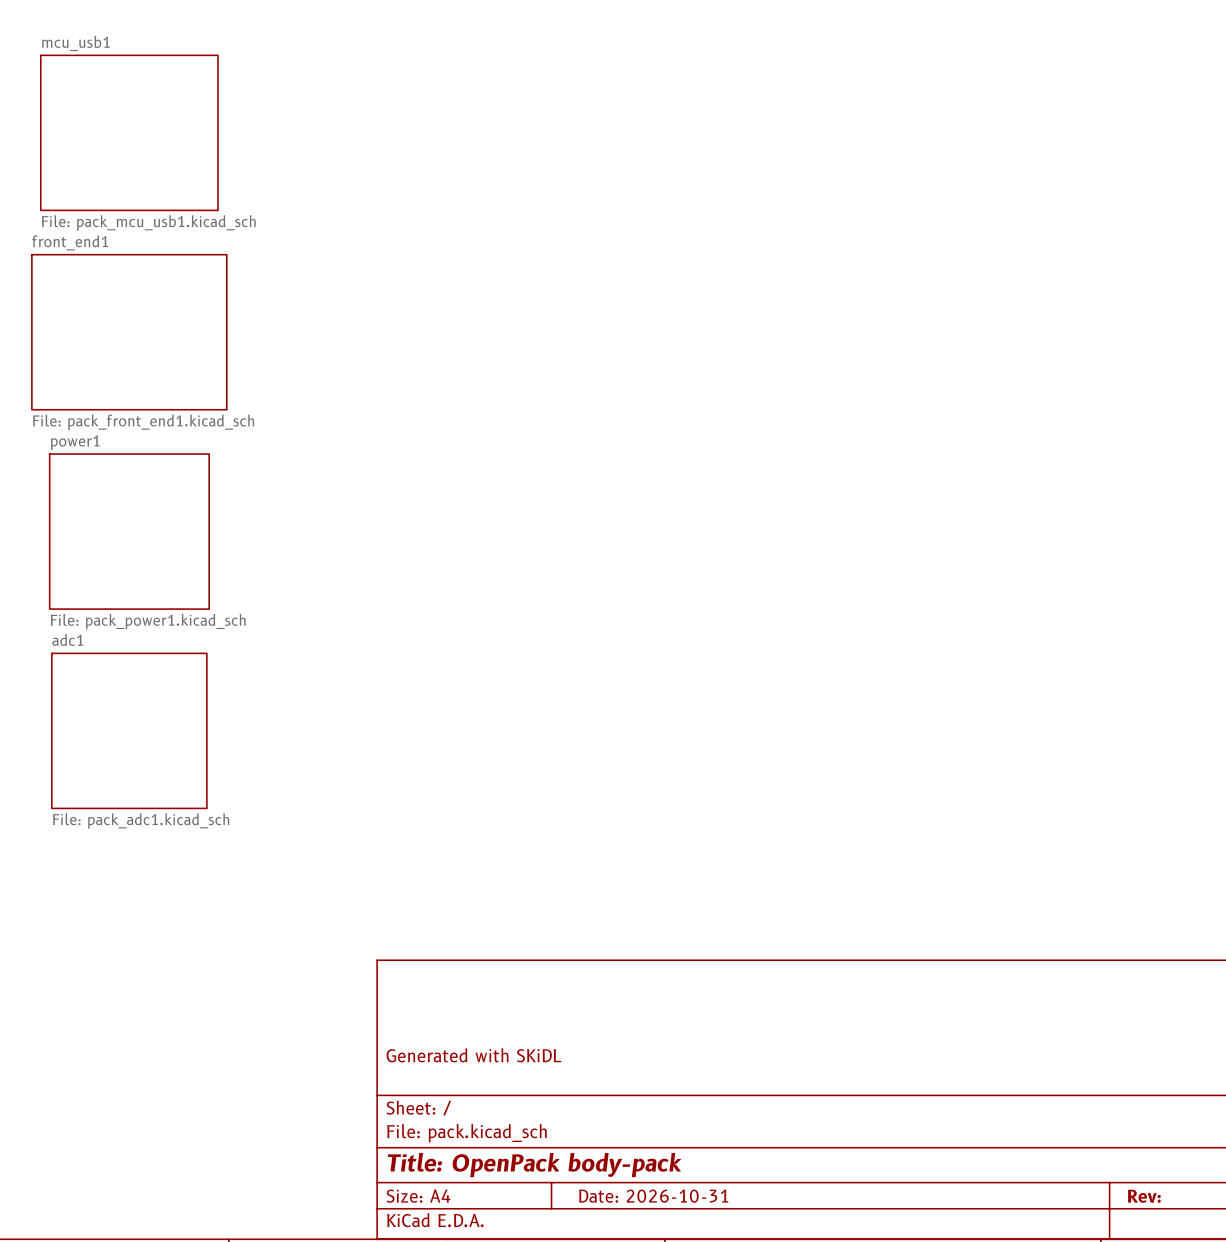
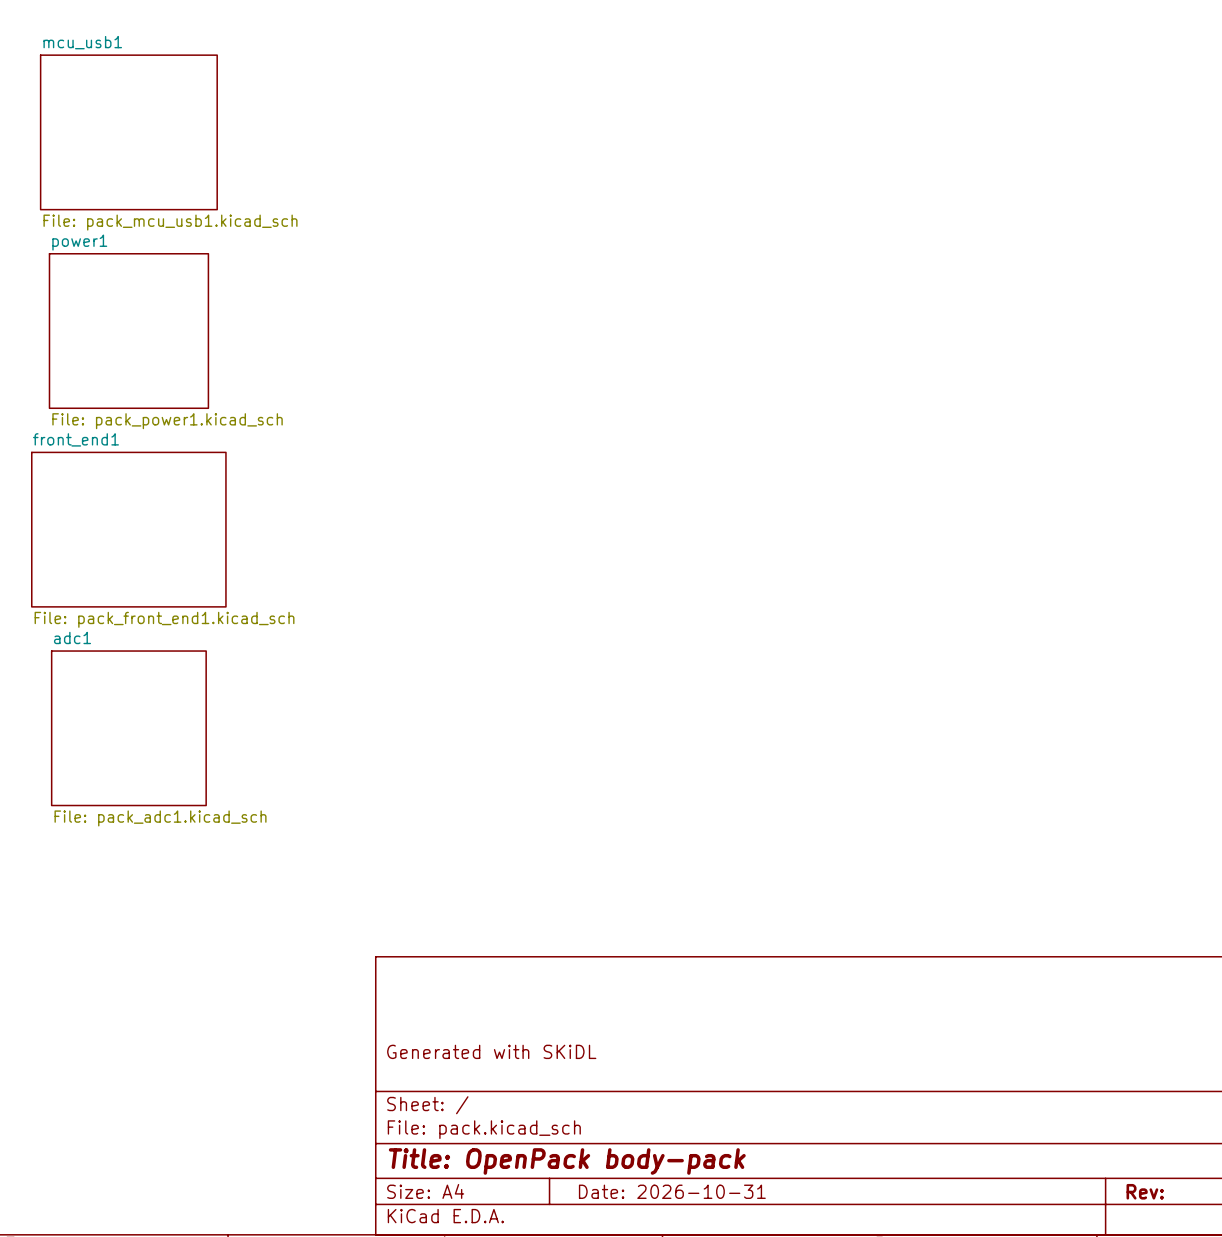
sheet front_end1 position: (129, 332) -> (128, 529)
sheet power1 position: (129, 531) -> (128, 331)

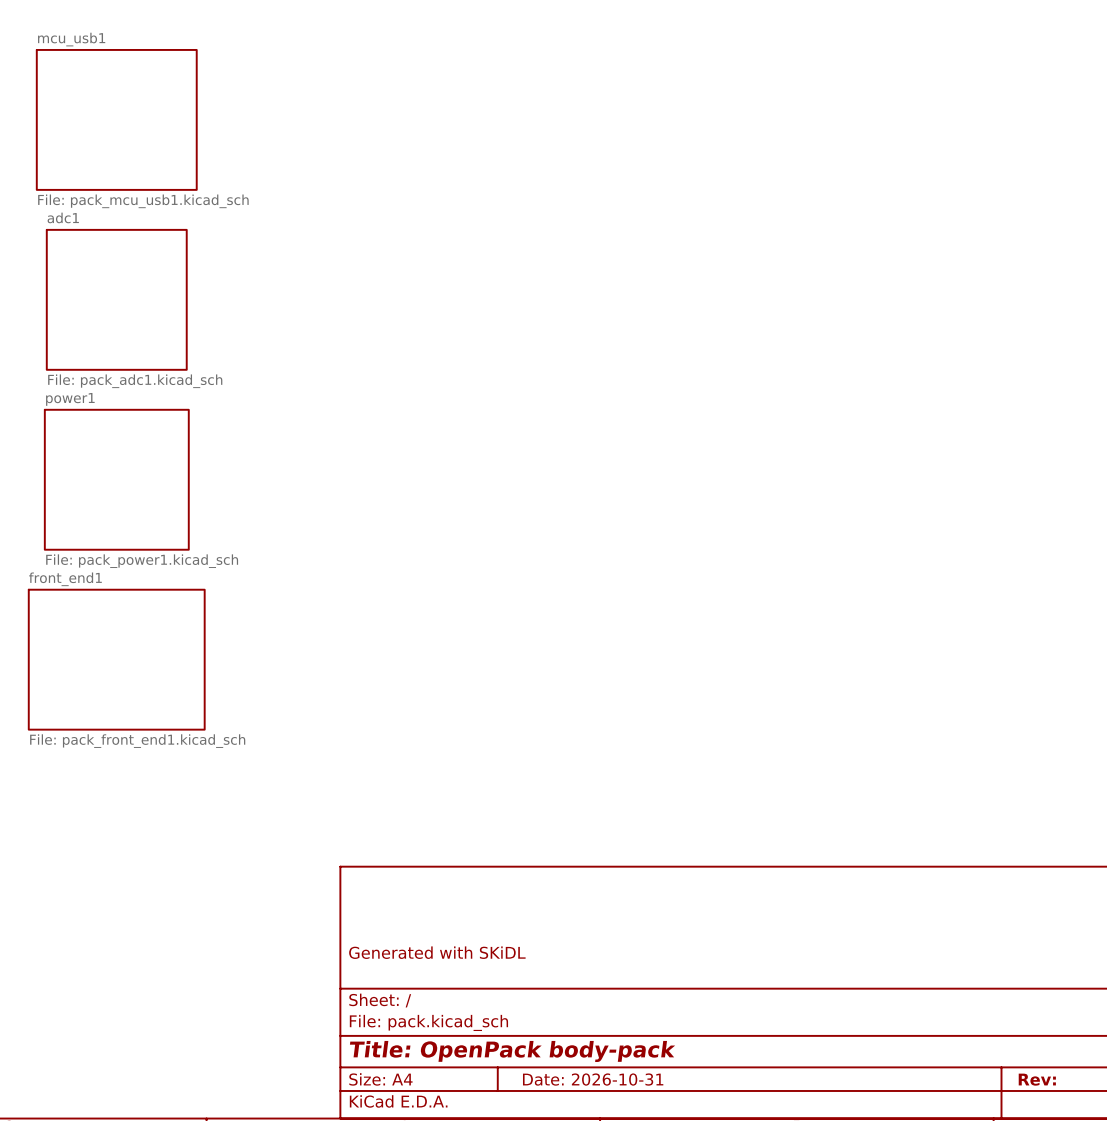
sheet power1 position: (128, 331) -> (116, 479)
sheet front_end1 position: (128, 529) -> (116, 659)
sheet adc1 position: (128, 728) -> (116, 299)

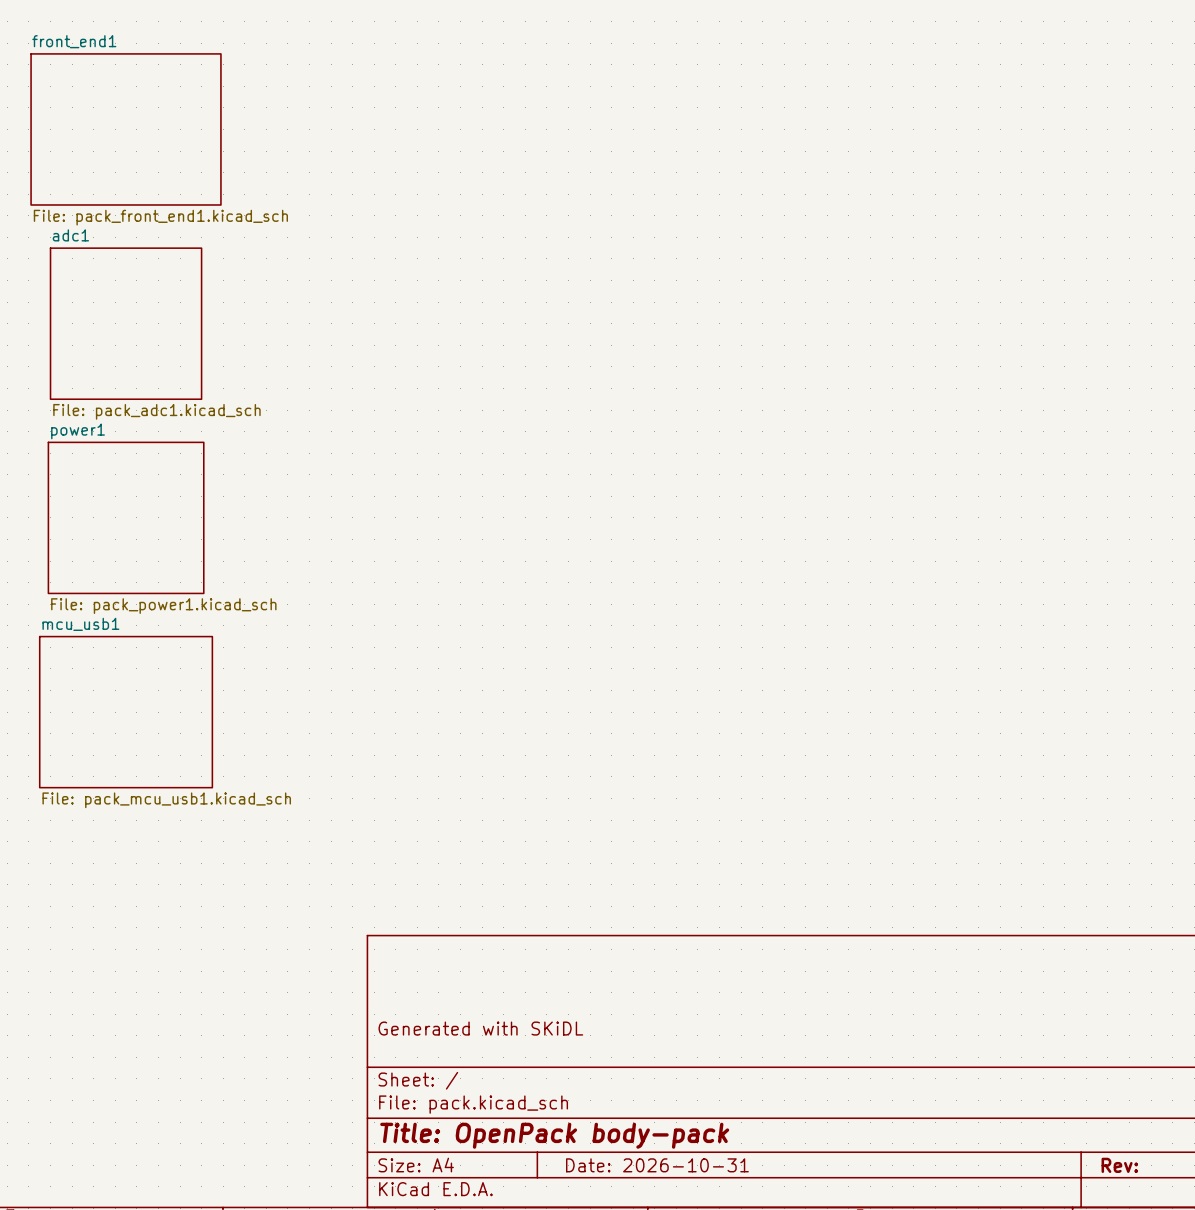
sheet mcu_usb1 position: (116, 119) -> (126, 712)
sheet front_end1 position: (116, 659) -> (126, 129)

